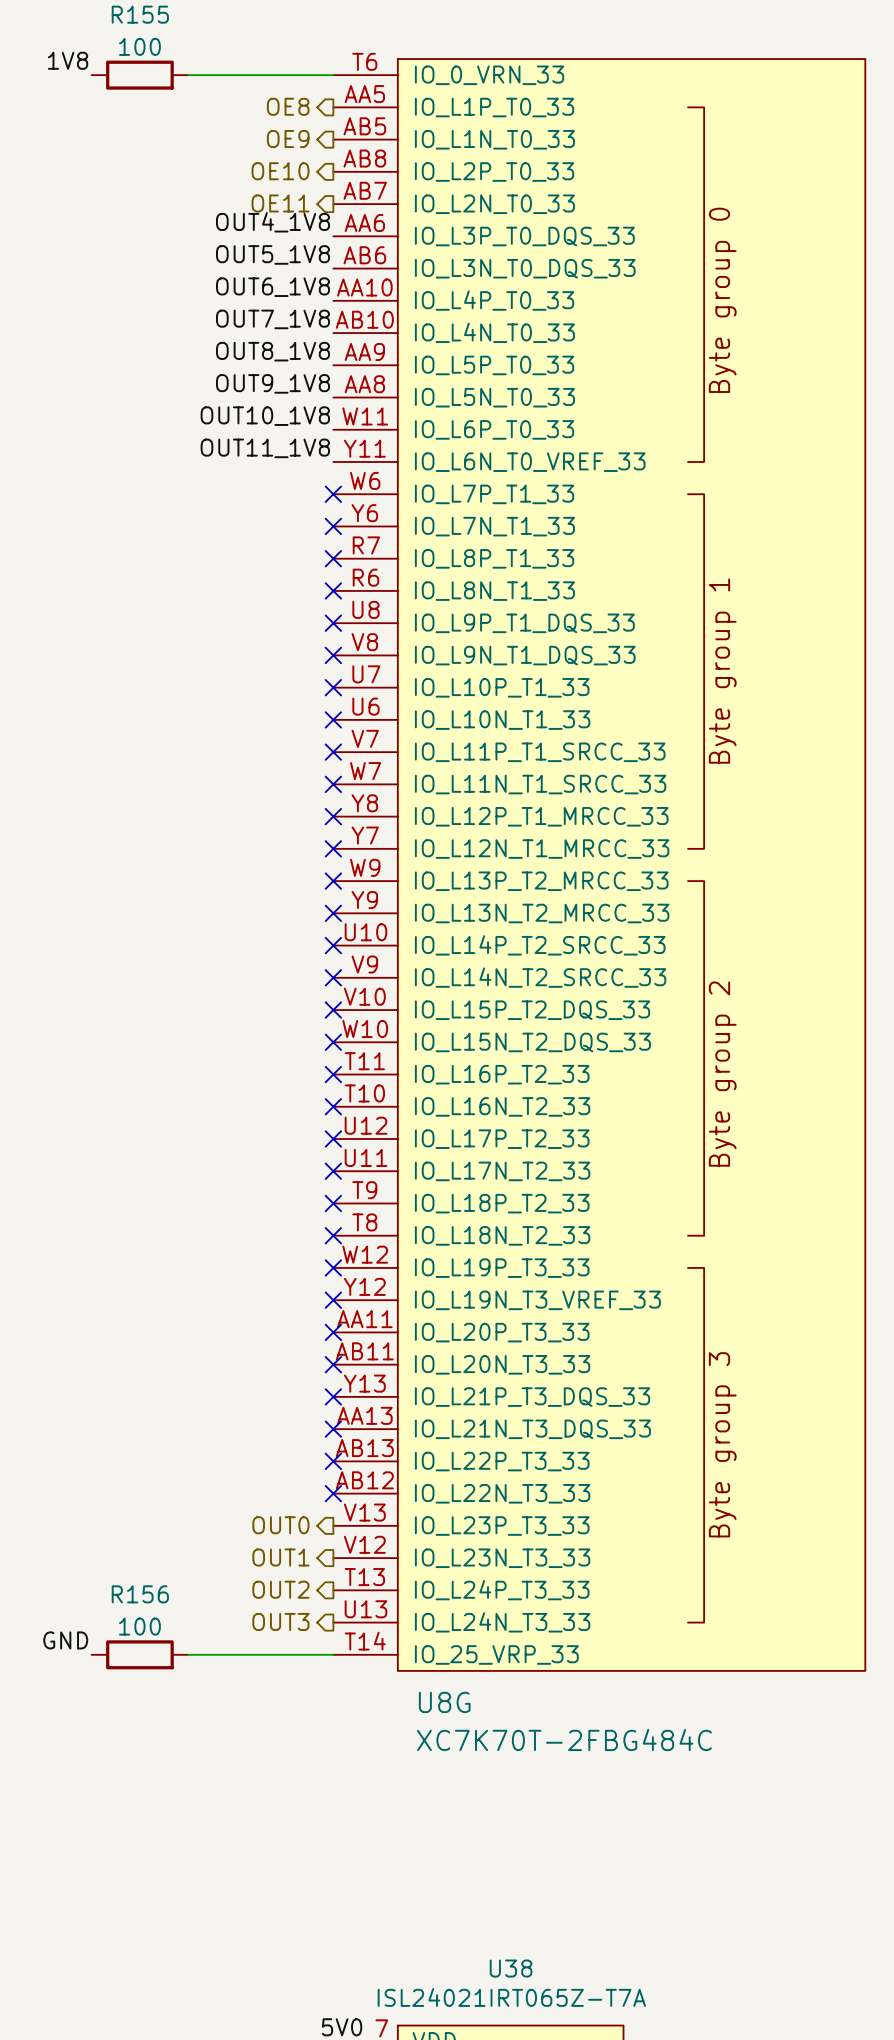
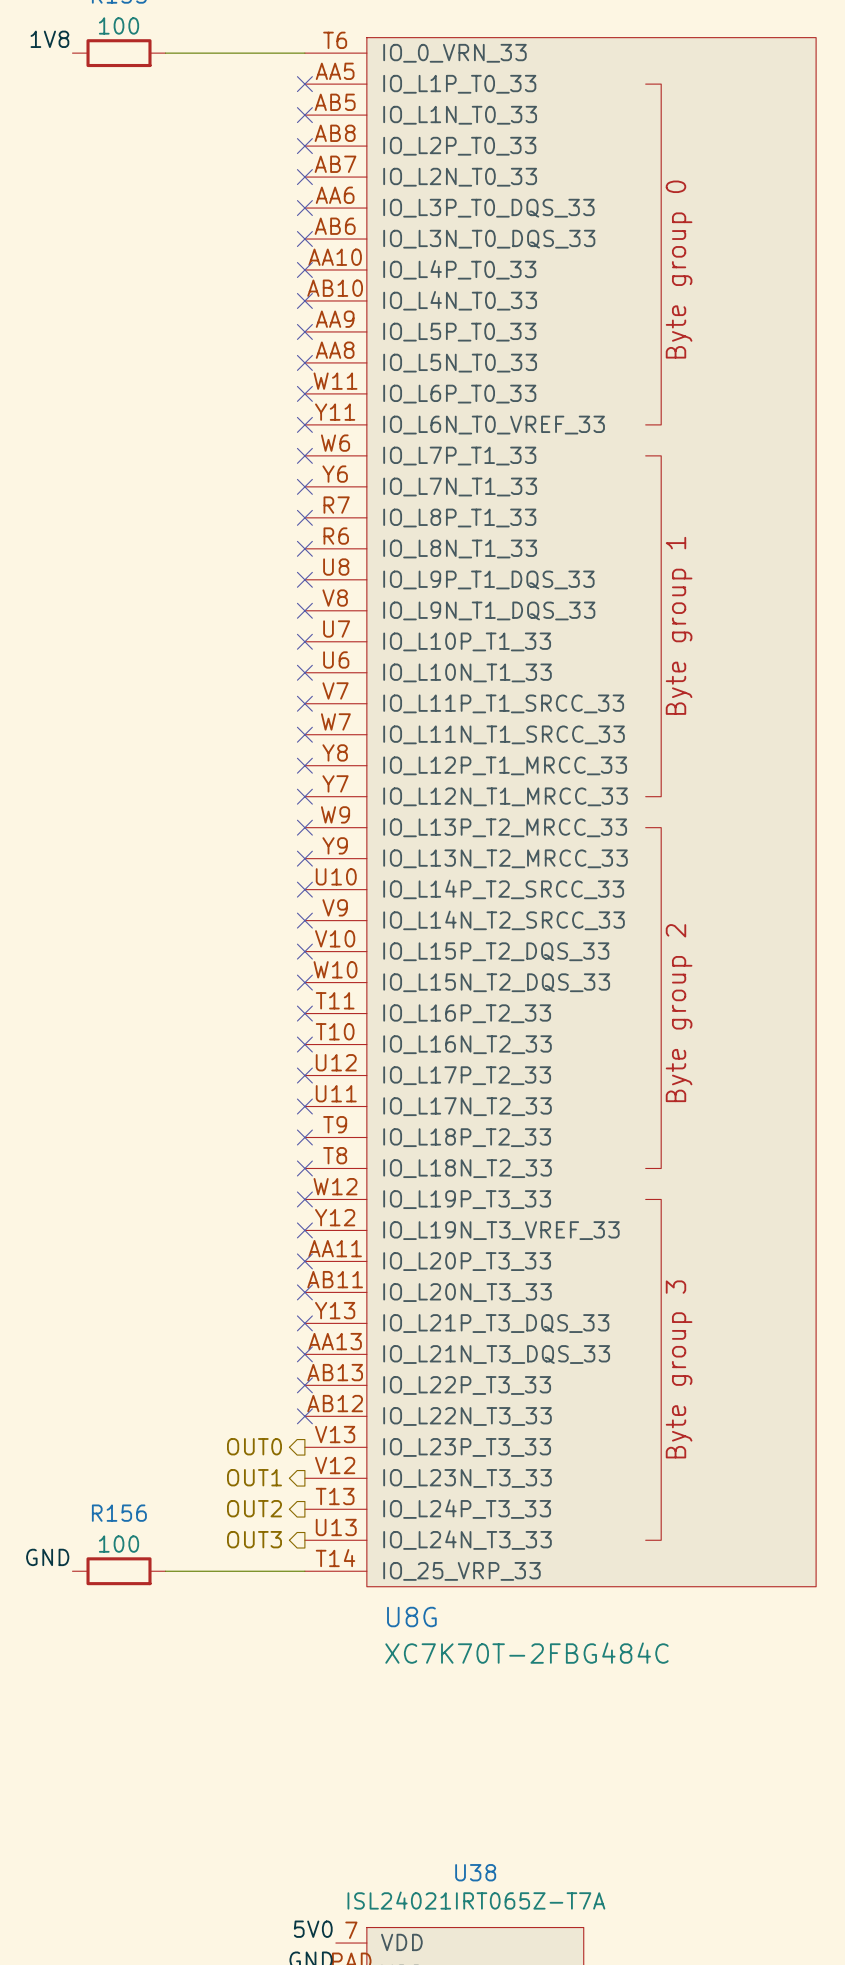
hierarchical label: OE8 (288, 106) -> none
no-connect mark: none -> (304, 84)
hierarchical label: OE9 (288, 139) -> none
no-connect mark: none -> (304, 115)
hierarchical label: OE10 (280, 171) -> none
no-connect mark: none -> (304, 146)
hierarchical label: OE11 (280, 203) -> none
no-connect mark: none -> (304, 177)
label: OUT4_1V8 (272, 222) -> none
no-connect mark: none -> (304, 208)
label: OUT5_1V8 (272, 254) -> none
no-connect mark: none -> (304, 239)
label: OUT6_1V8 (272, 287) -> none
no-connect mark: none -> (304, 270)
label: OUT7_1V8 (272, 319) -> none
no-connect mark: none -> (304, 300)
label: OUT8_1V8 (272, 351) -> none
no-connect mark: none -> (304, 331)
label: OUT9_1V8 (272, 383) -> none
no-connect mark: none -> (304, 362)
label: OUT10_1V8 (265, 416) -> none
no-connect mark: none -> (304, 393)
label: OUT11_1V8 (265, 448) -> none
no-connect mark: none -> (304, 424)

